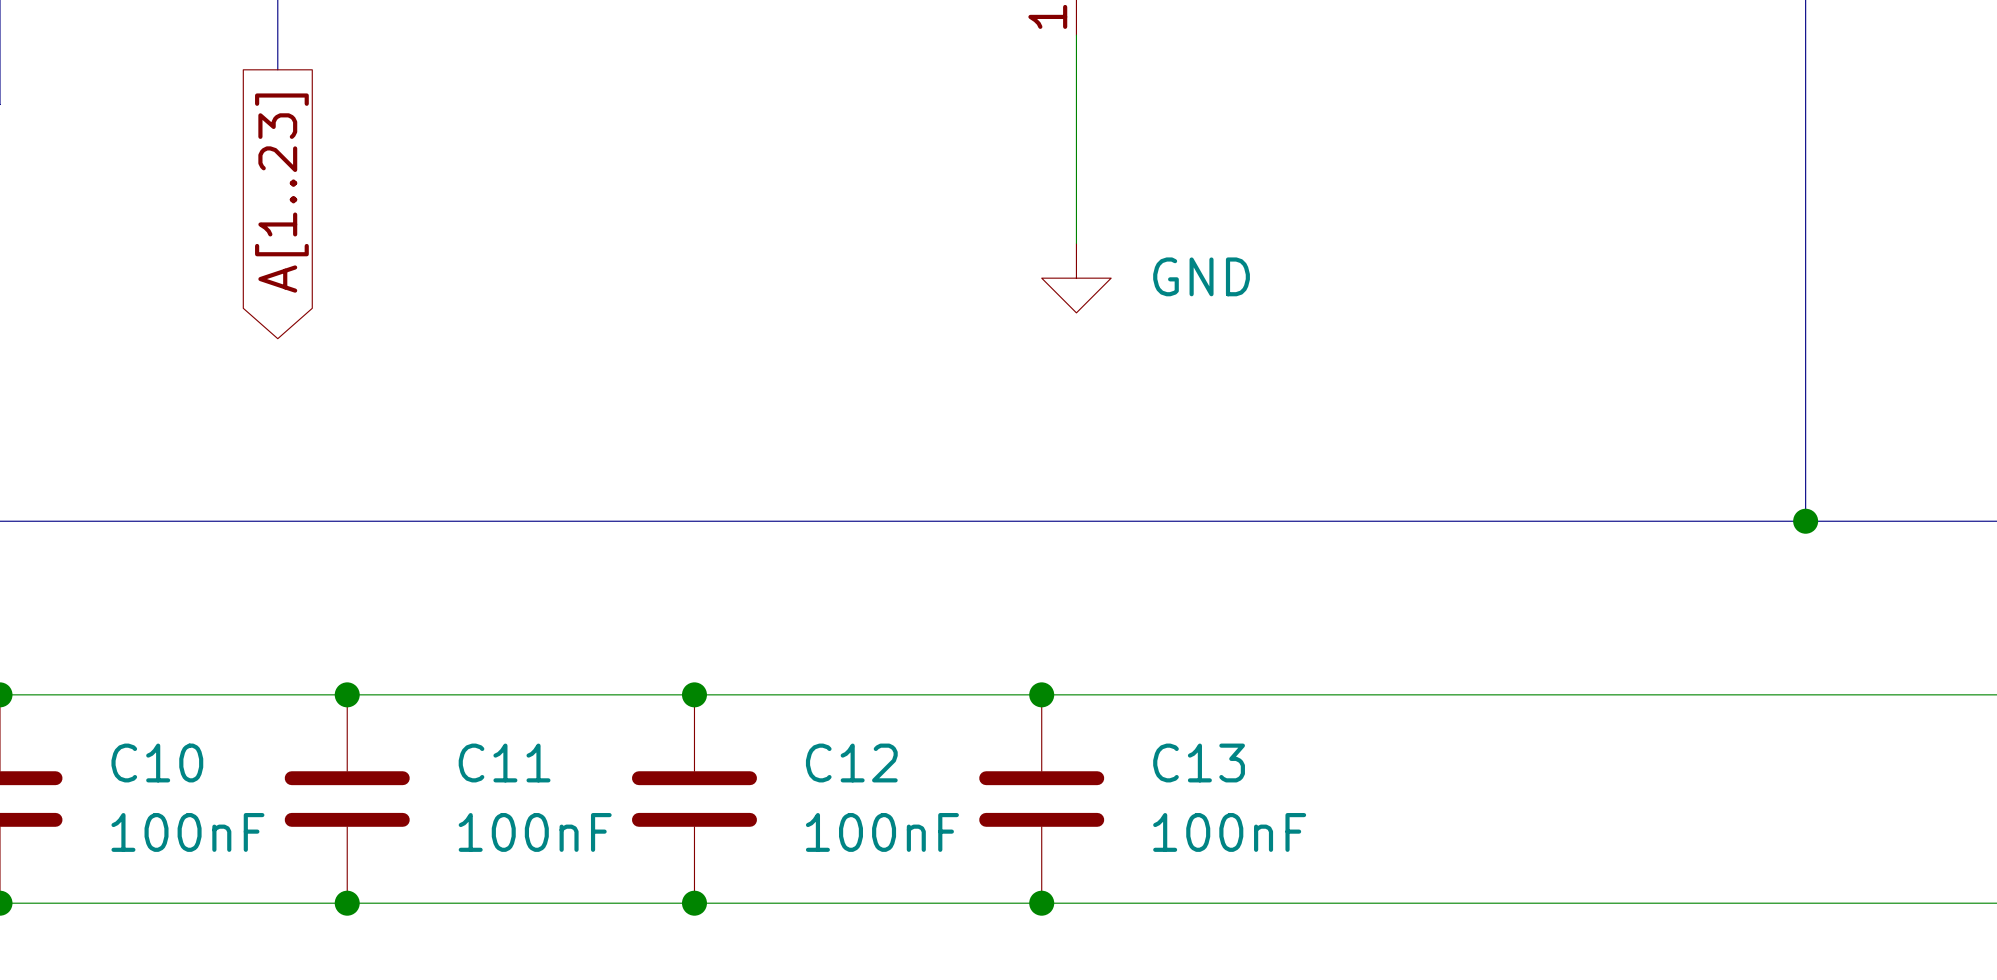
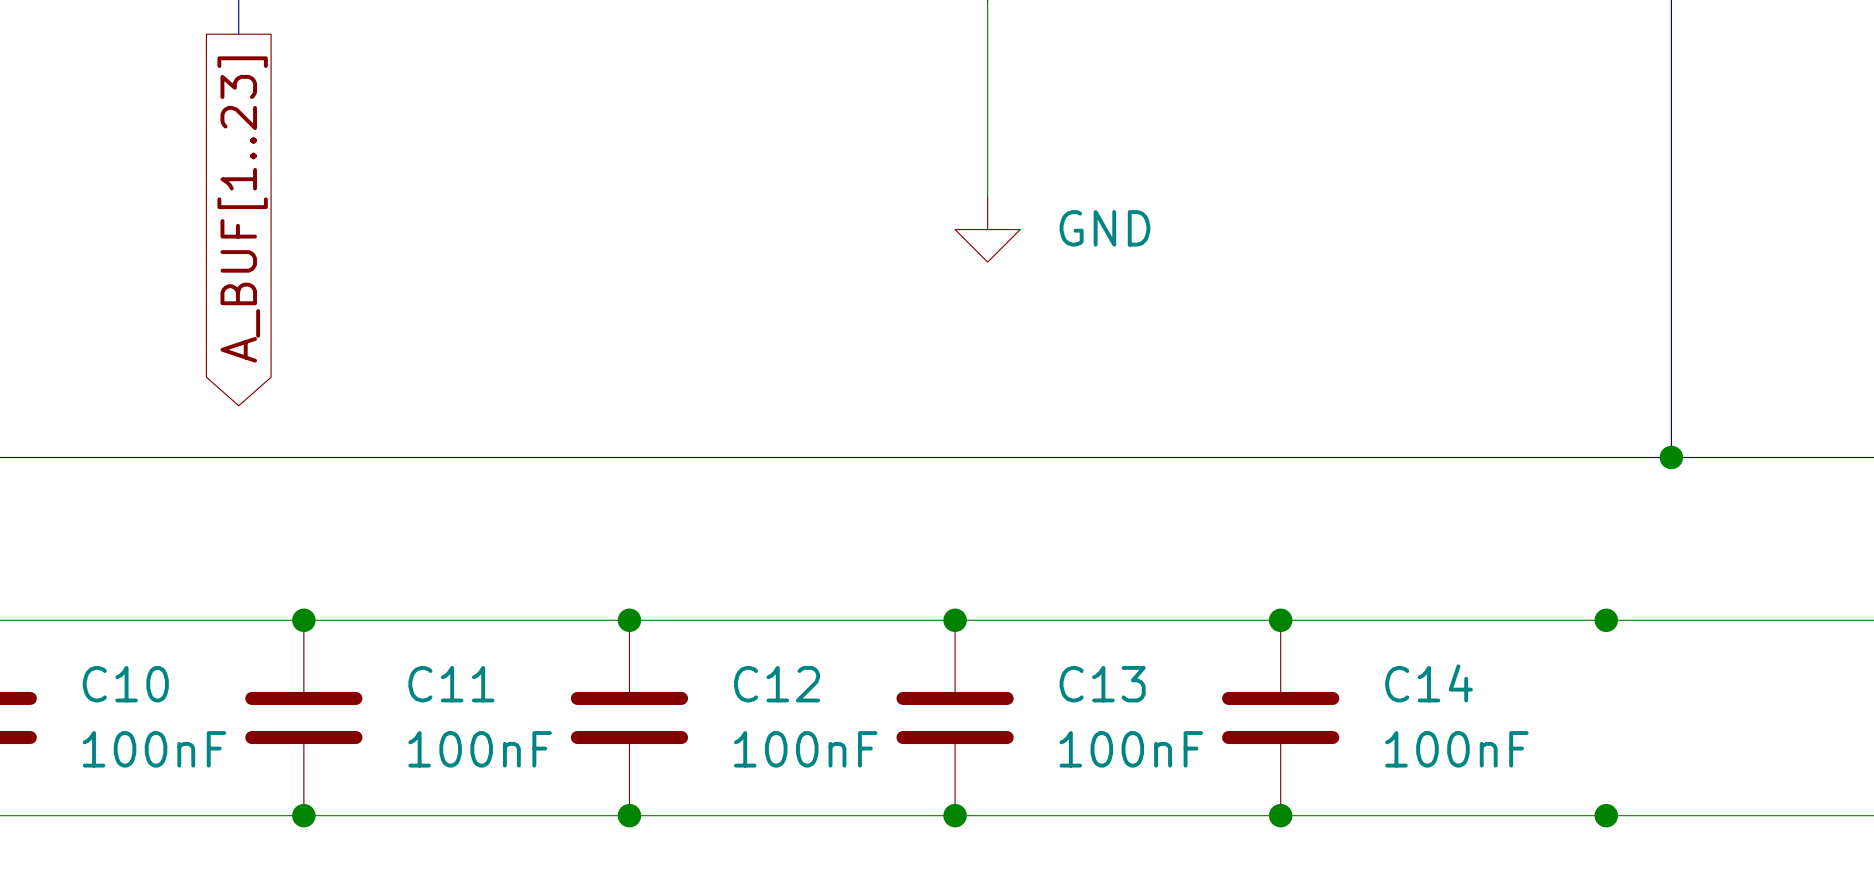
global label: A[1..23] (281, 193) -> A_BUF[1..23] (242, 209)
junction: none -> (1280, 620)
junction: none -> (1606, 620)
C14: none -> 100nF (1280, 717)
junction: none -> (1280, 815)
junction: none -> (1606, 815)

